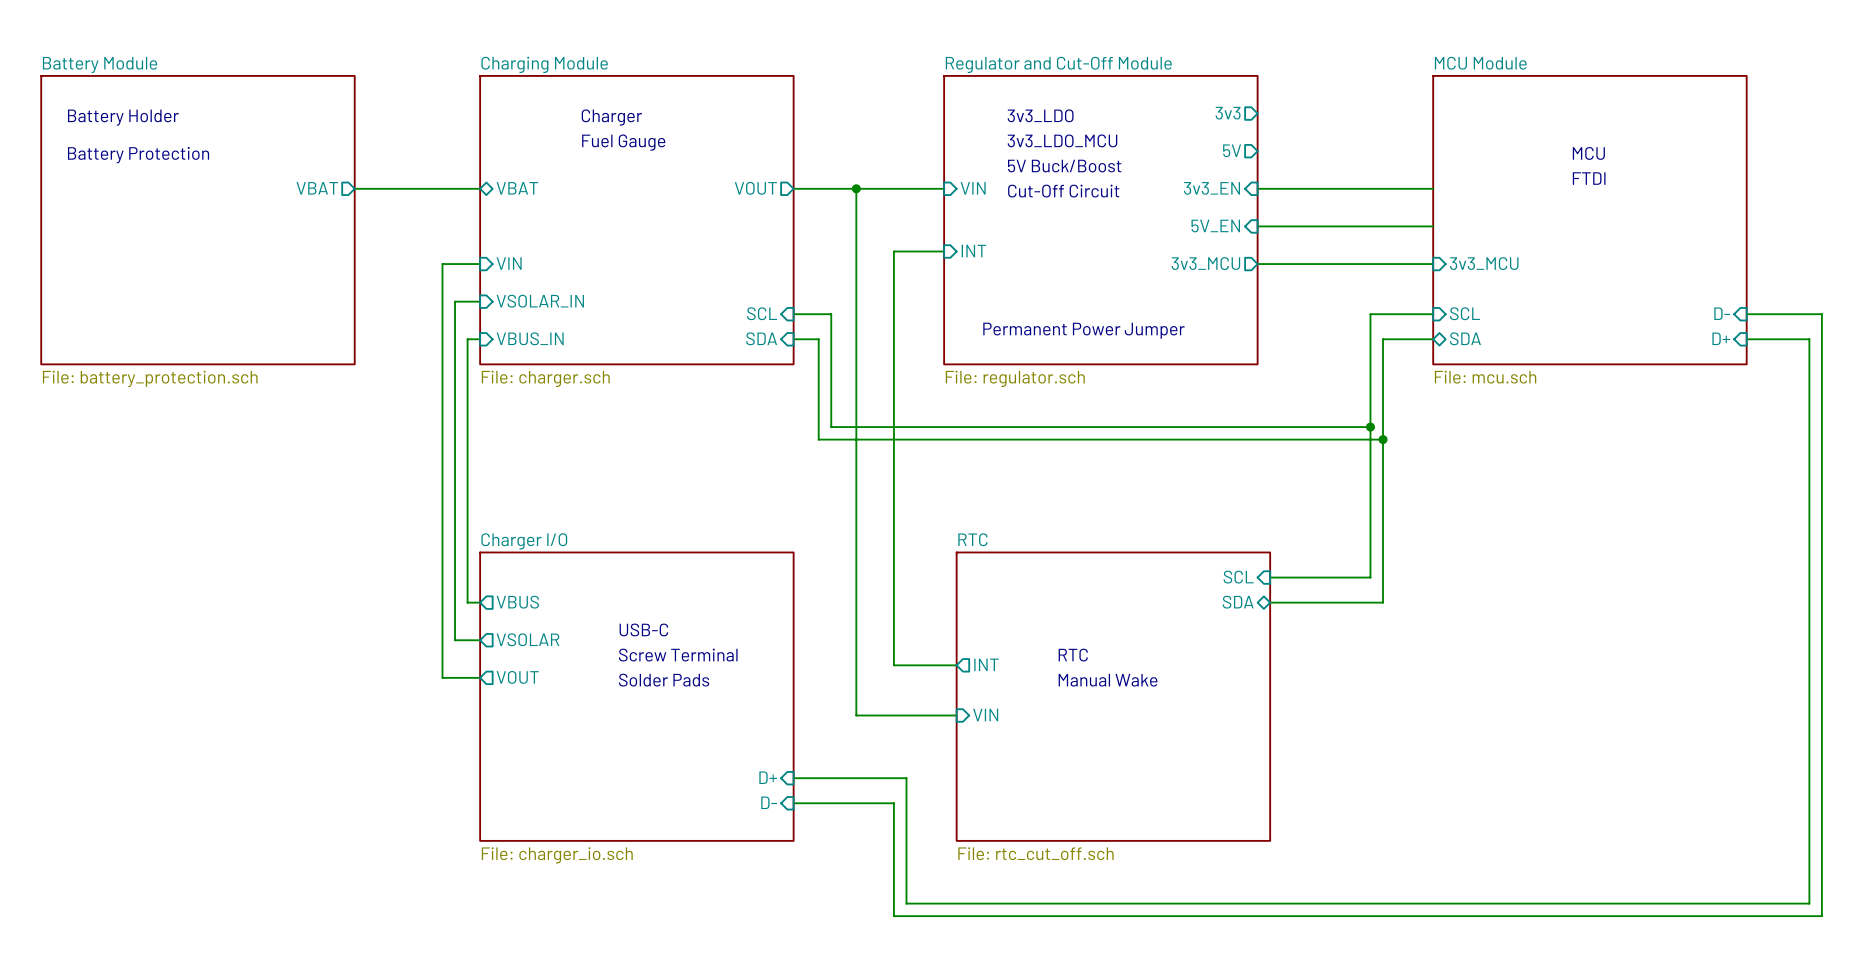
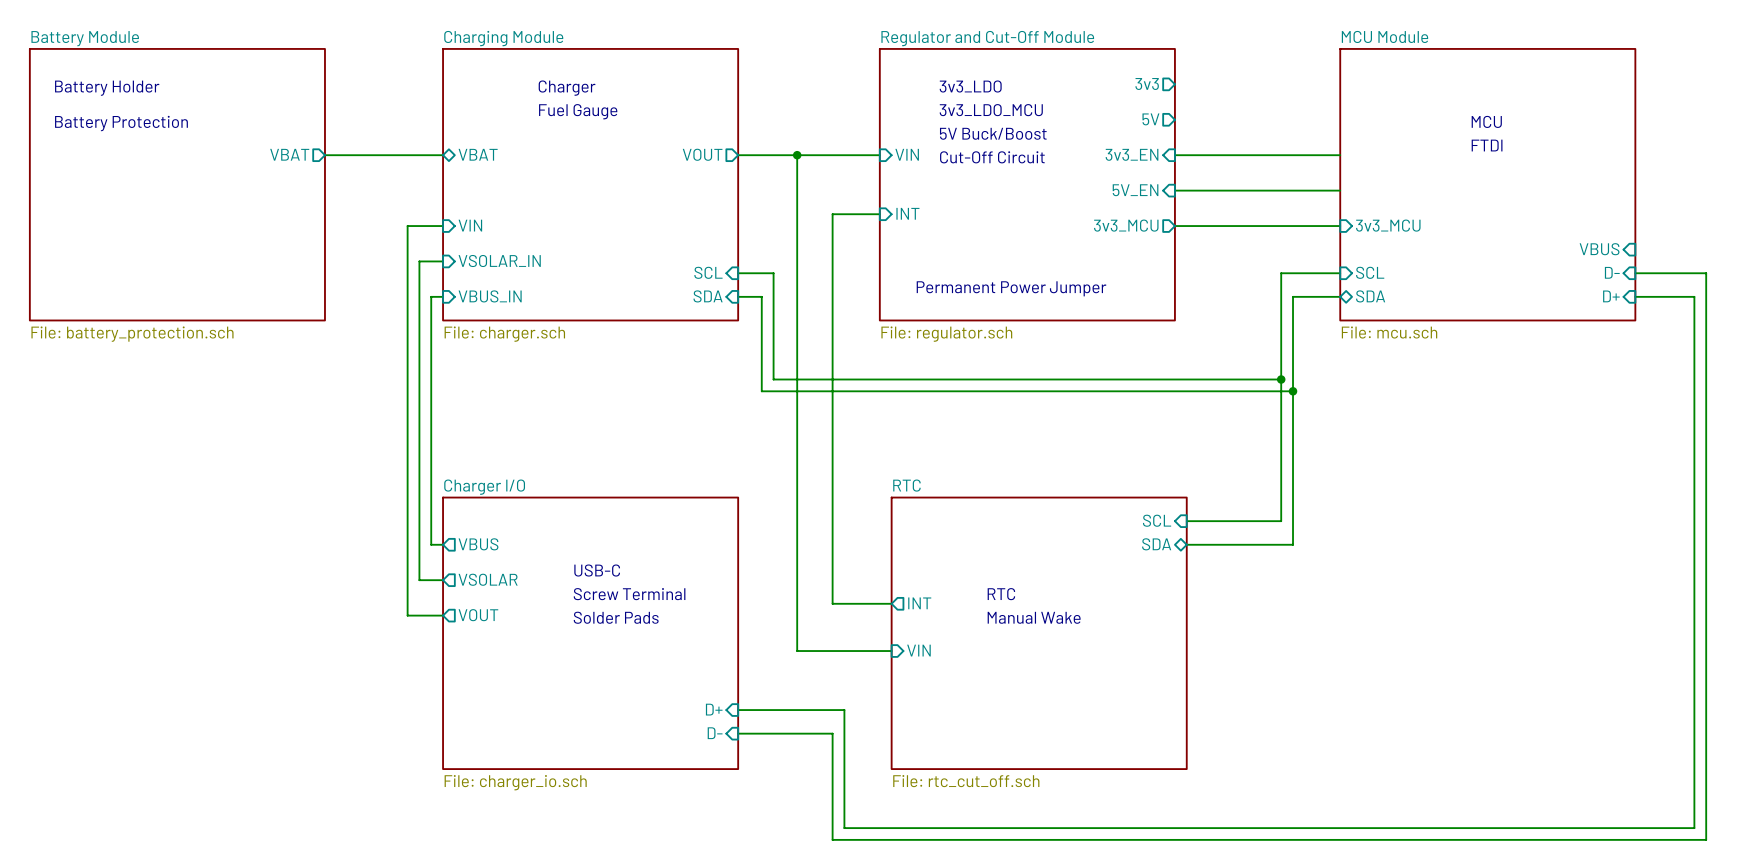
sheet pin: none -> VBUS (1599, 249)

